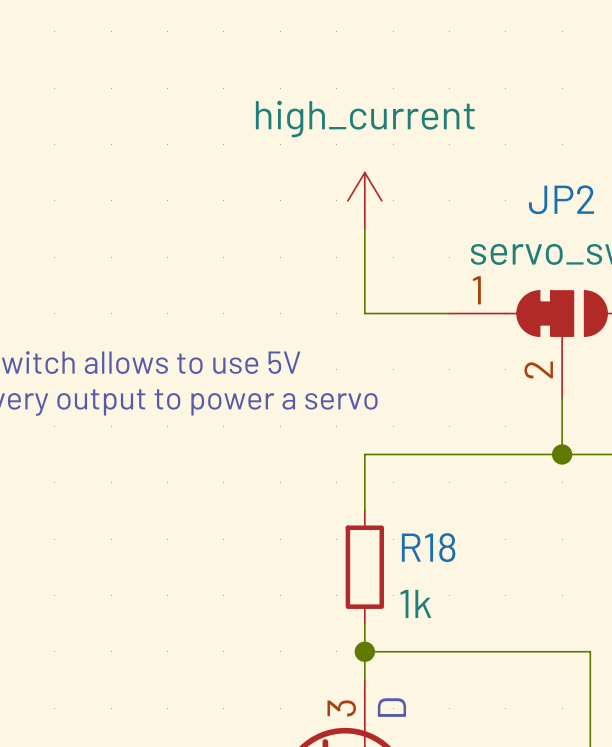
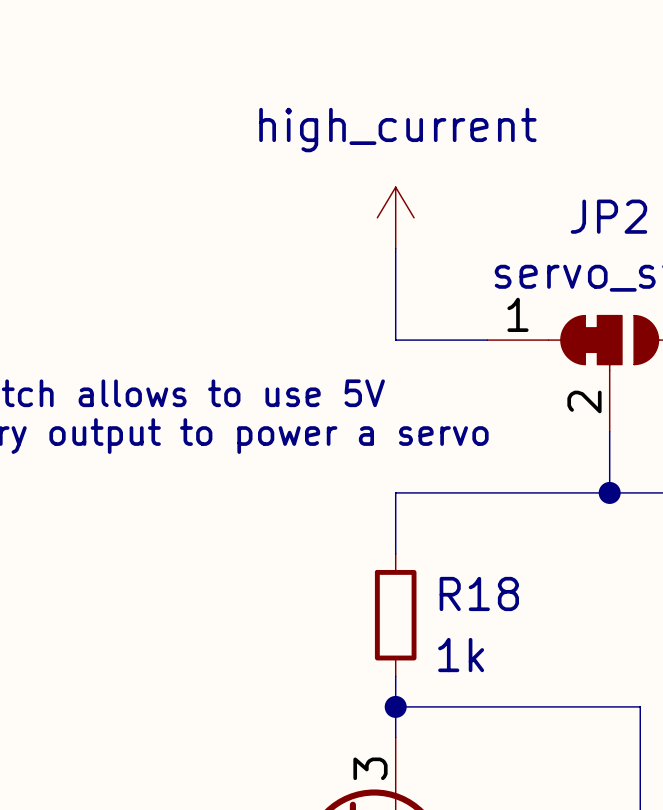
text: D (391, 707) -> none

